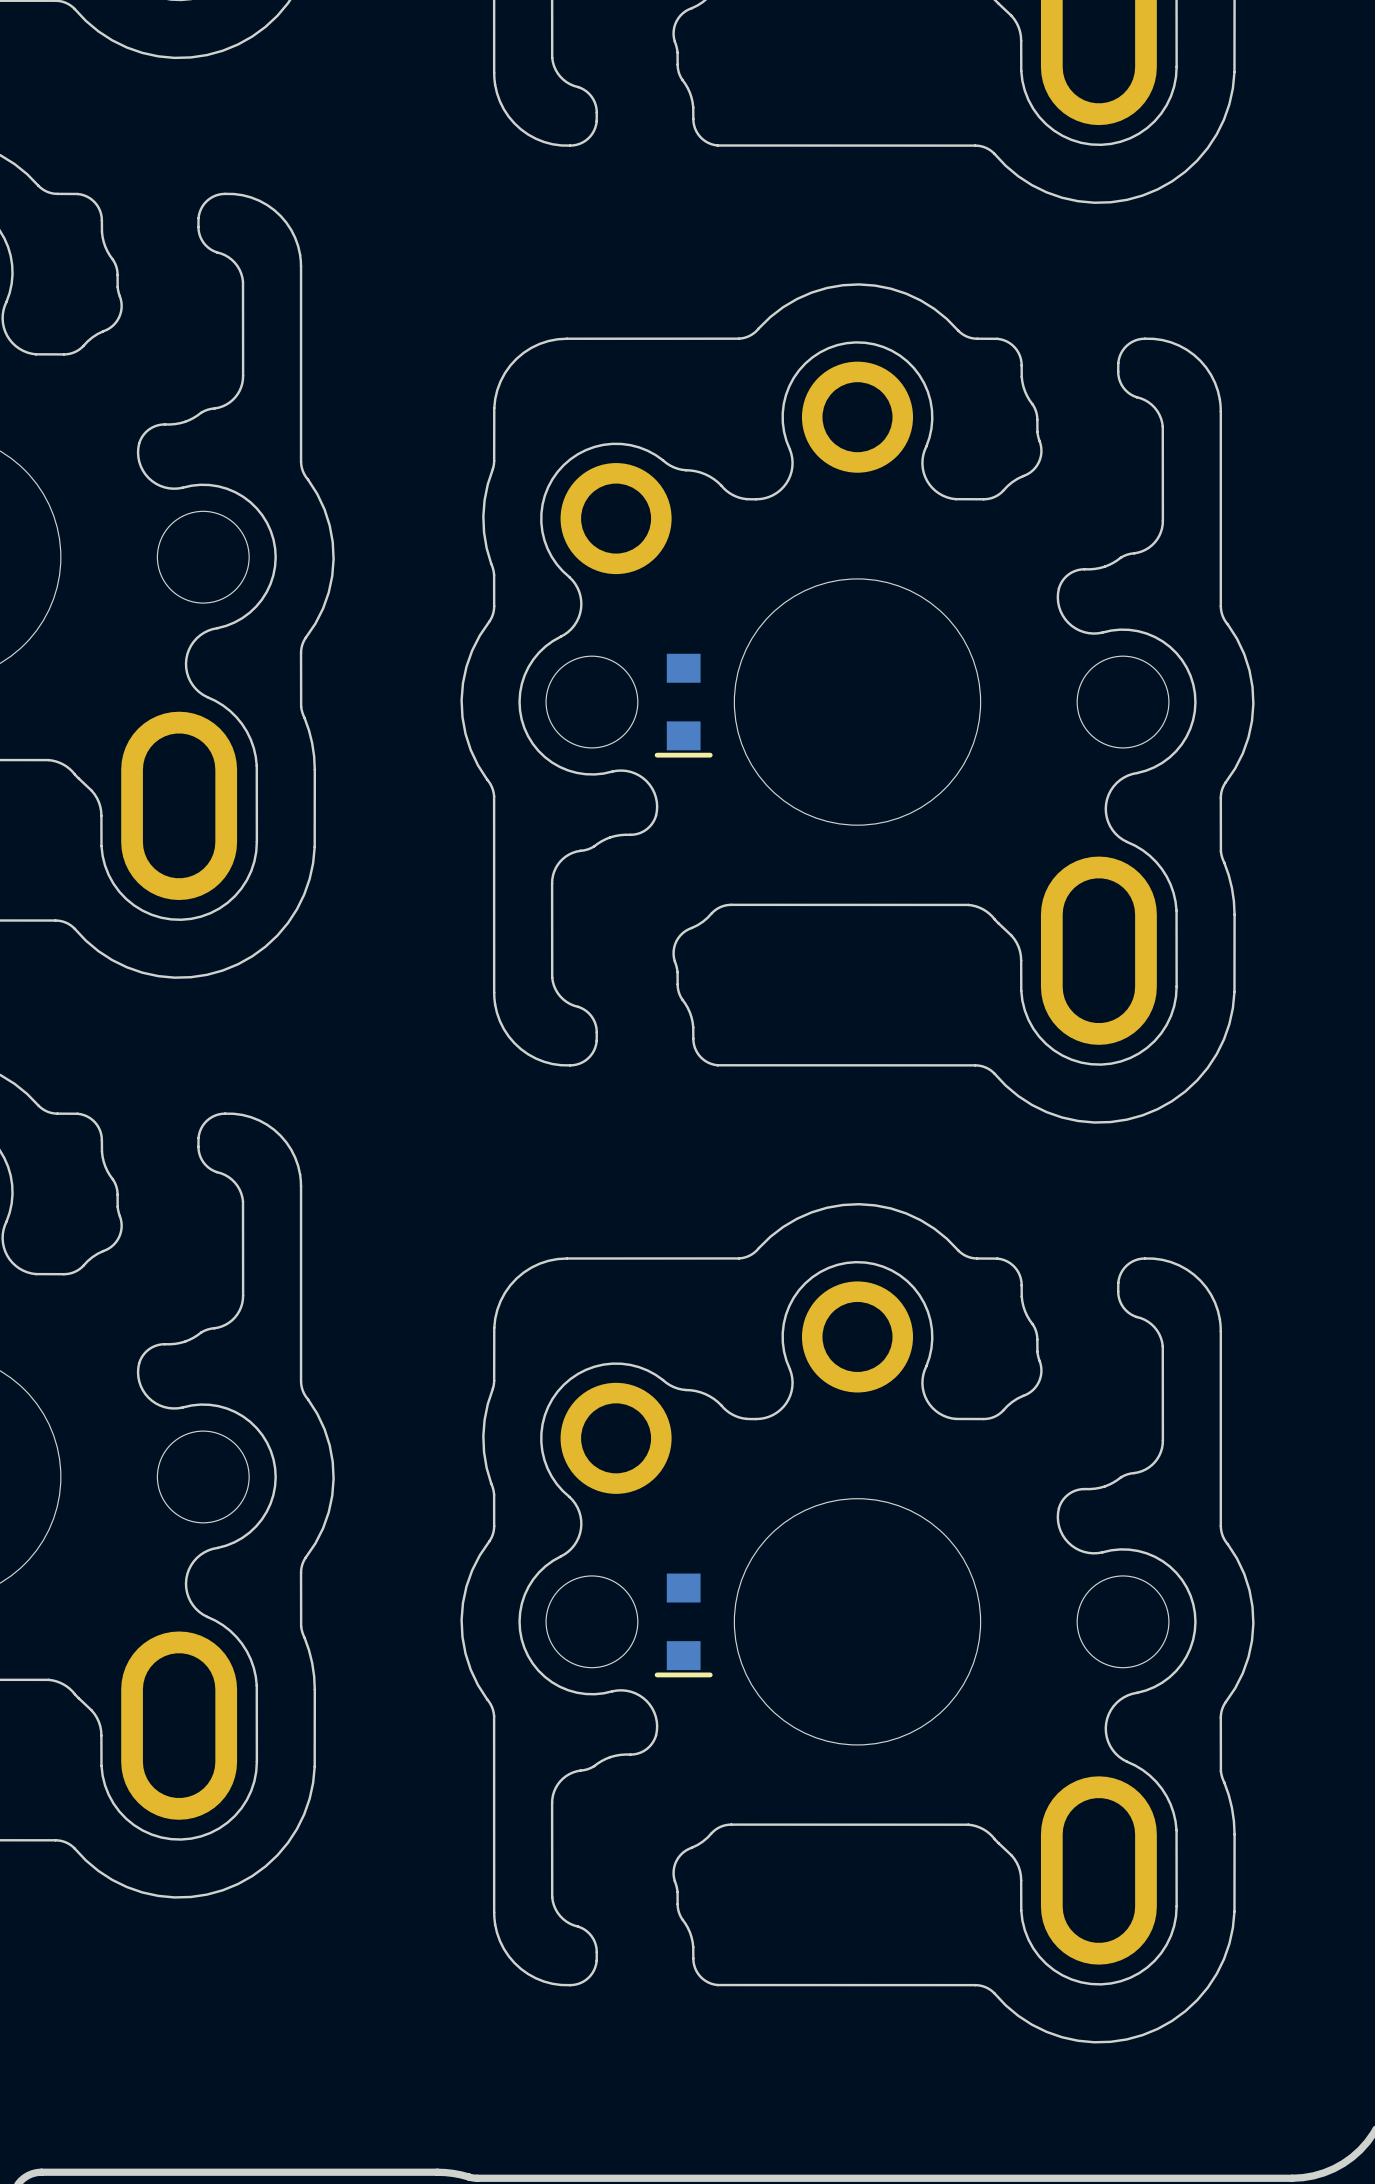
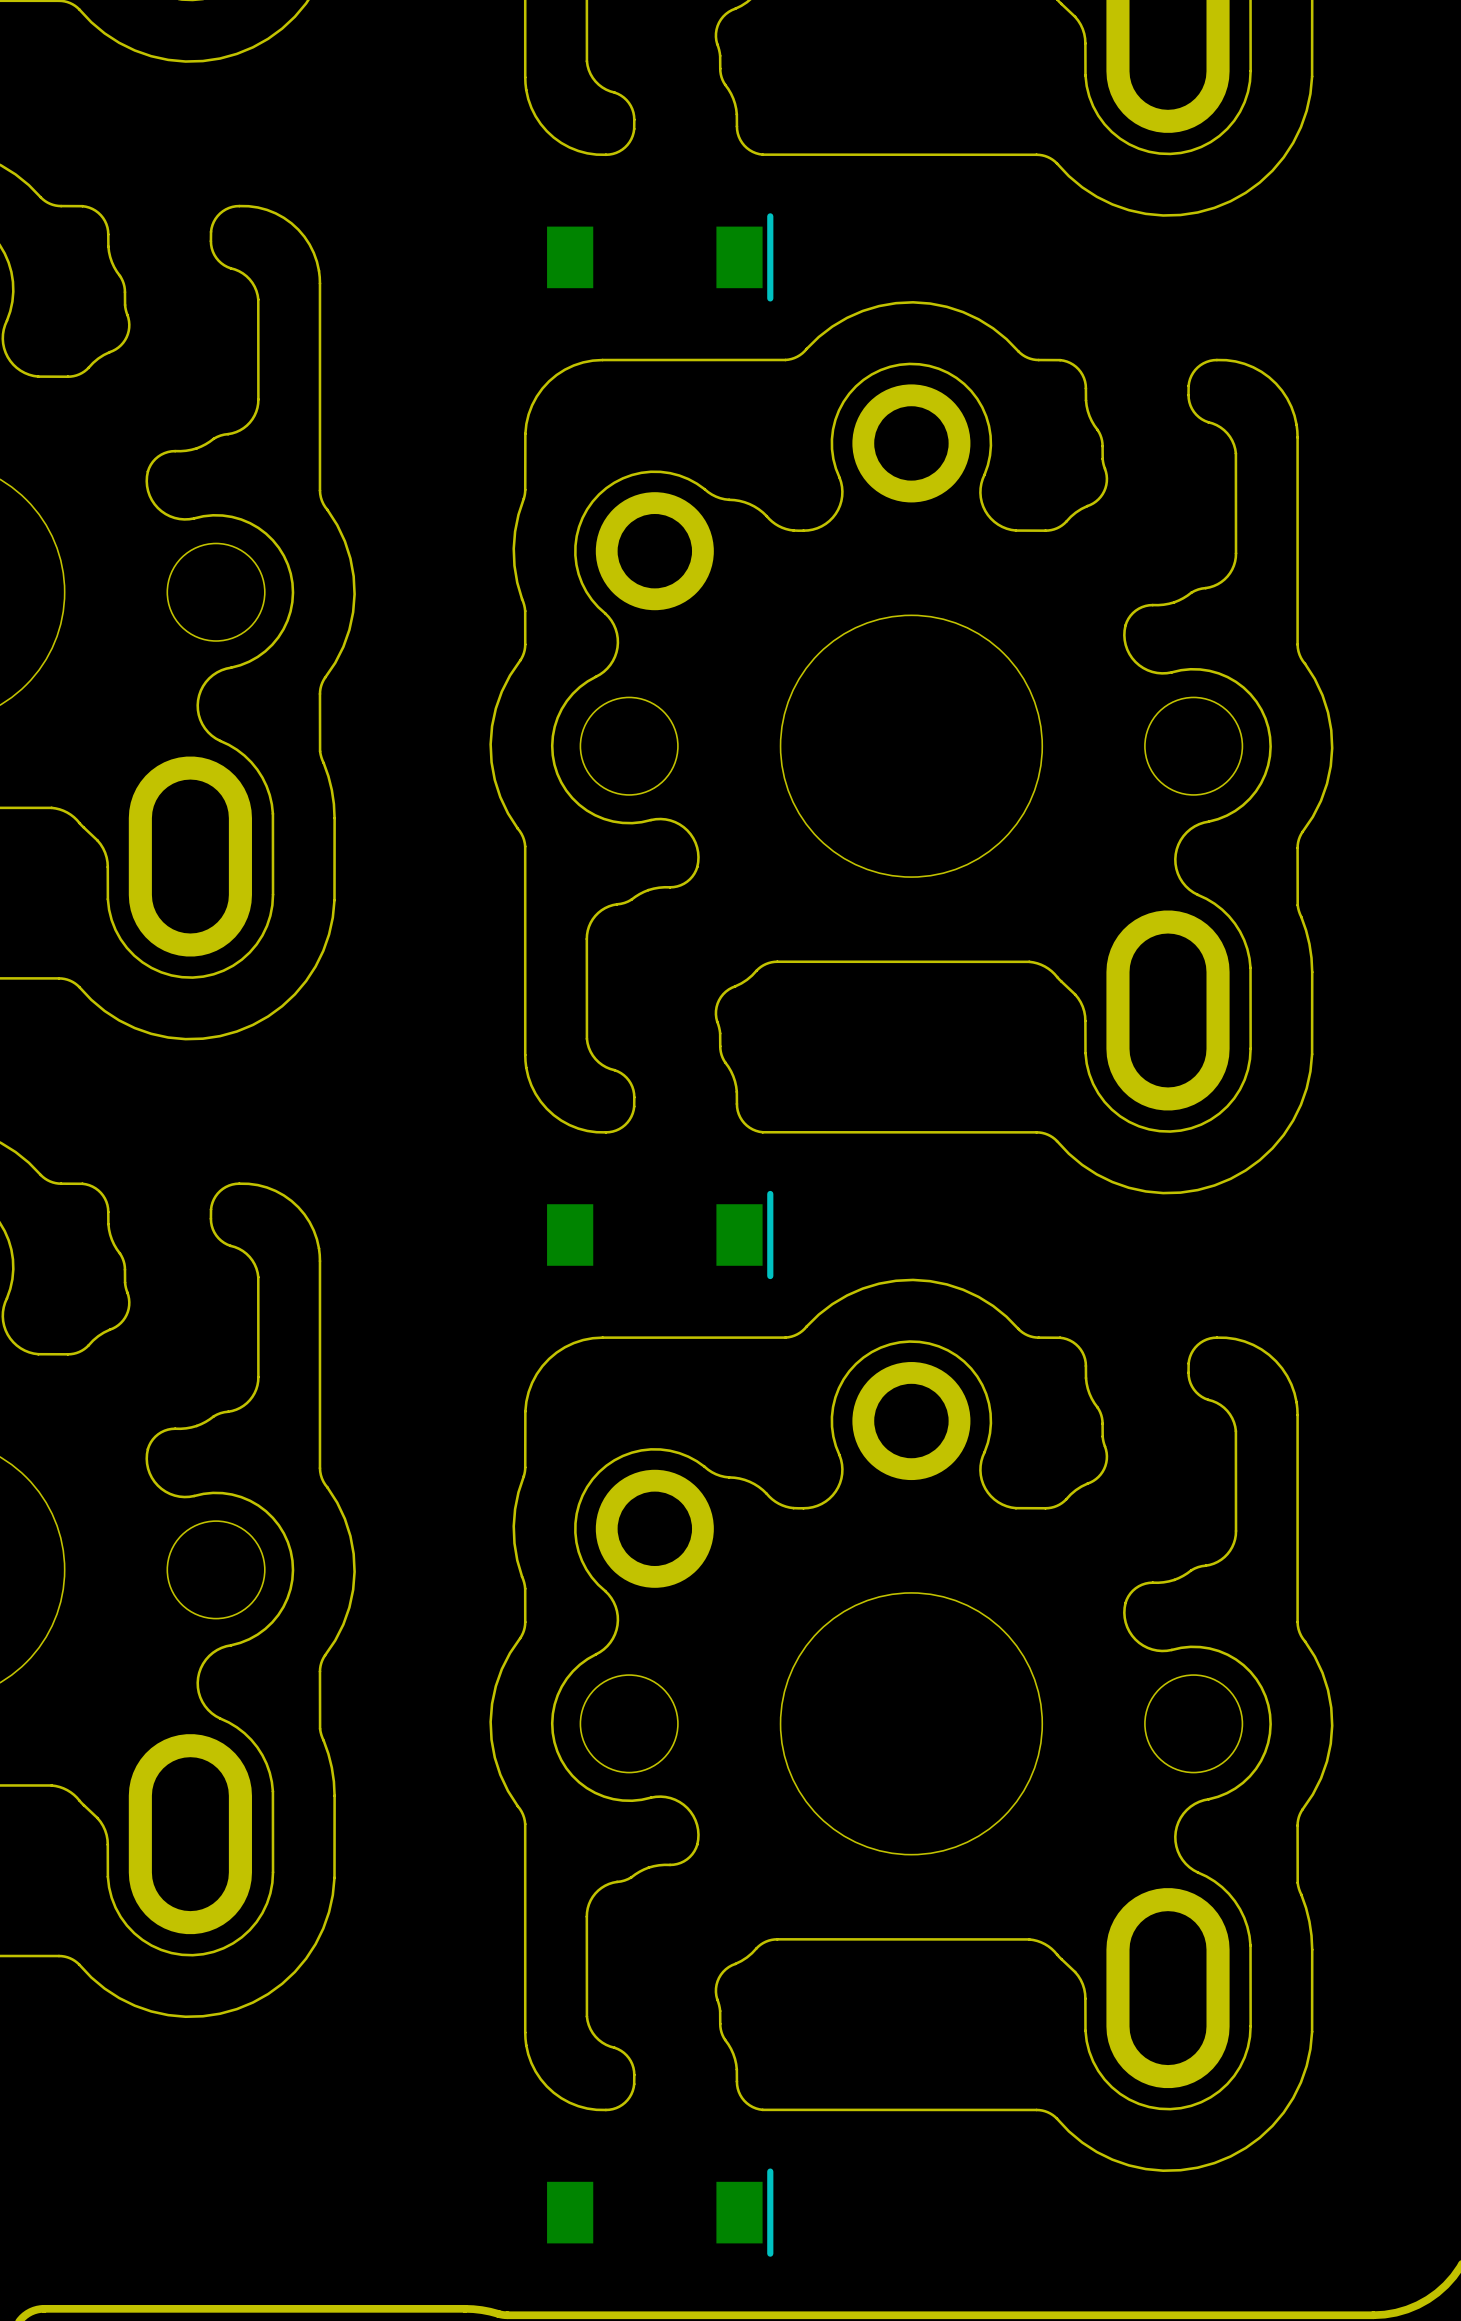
part: none -> (660, 257)
part: (683, 705) -> none
part: none -> (660, 1235)
part: (683, 1625) -> none
part: none -> (660, 2212)

